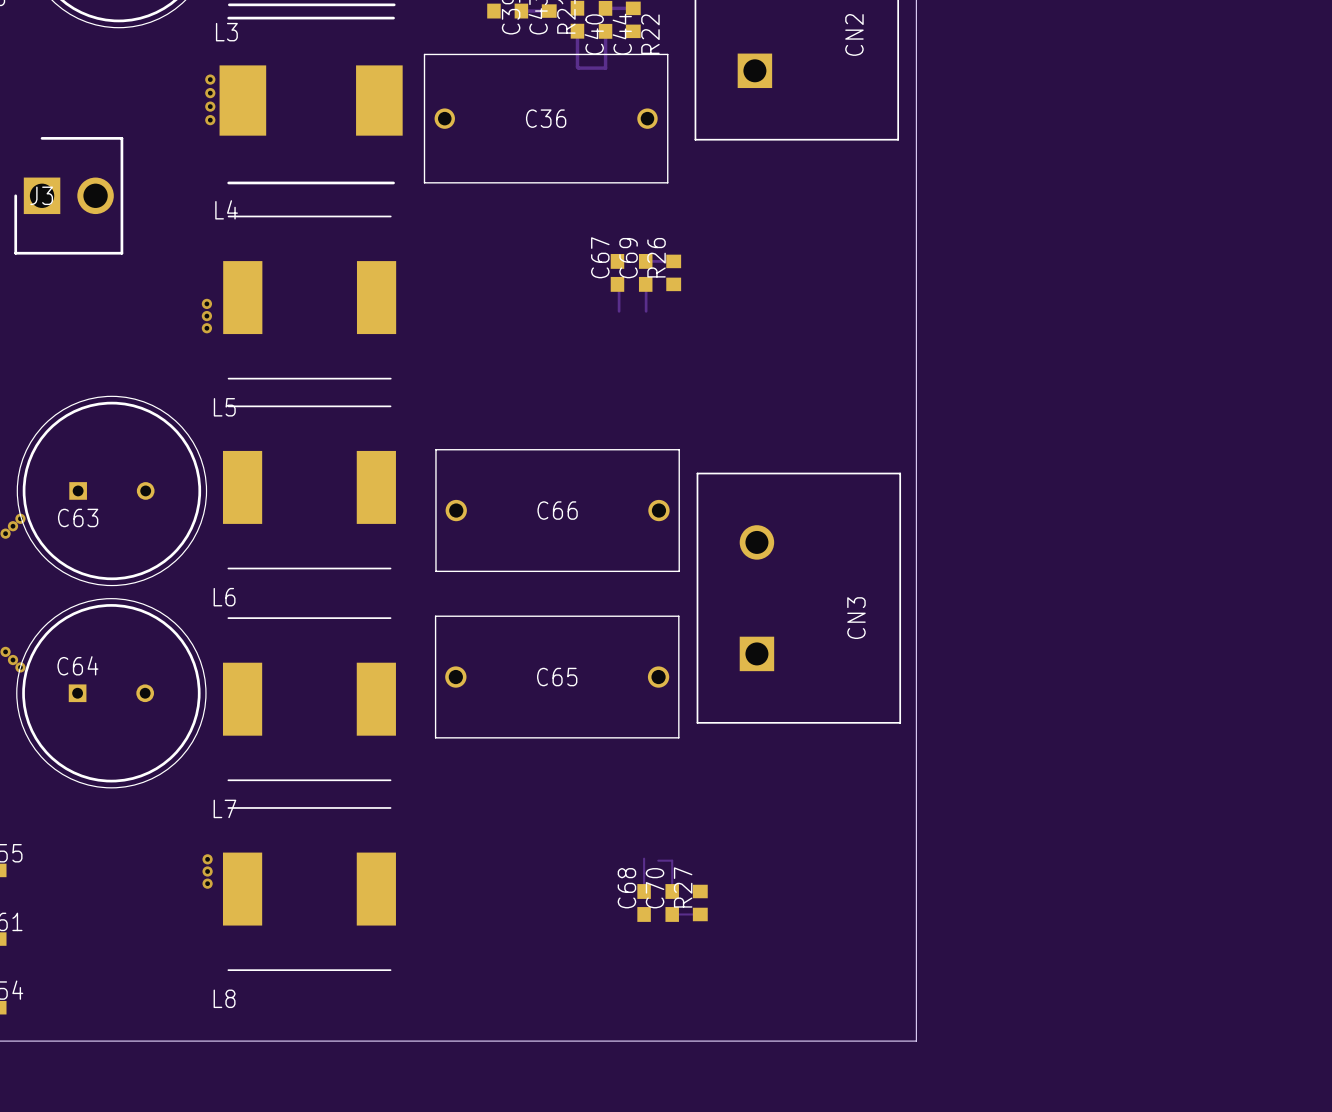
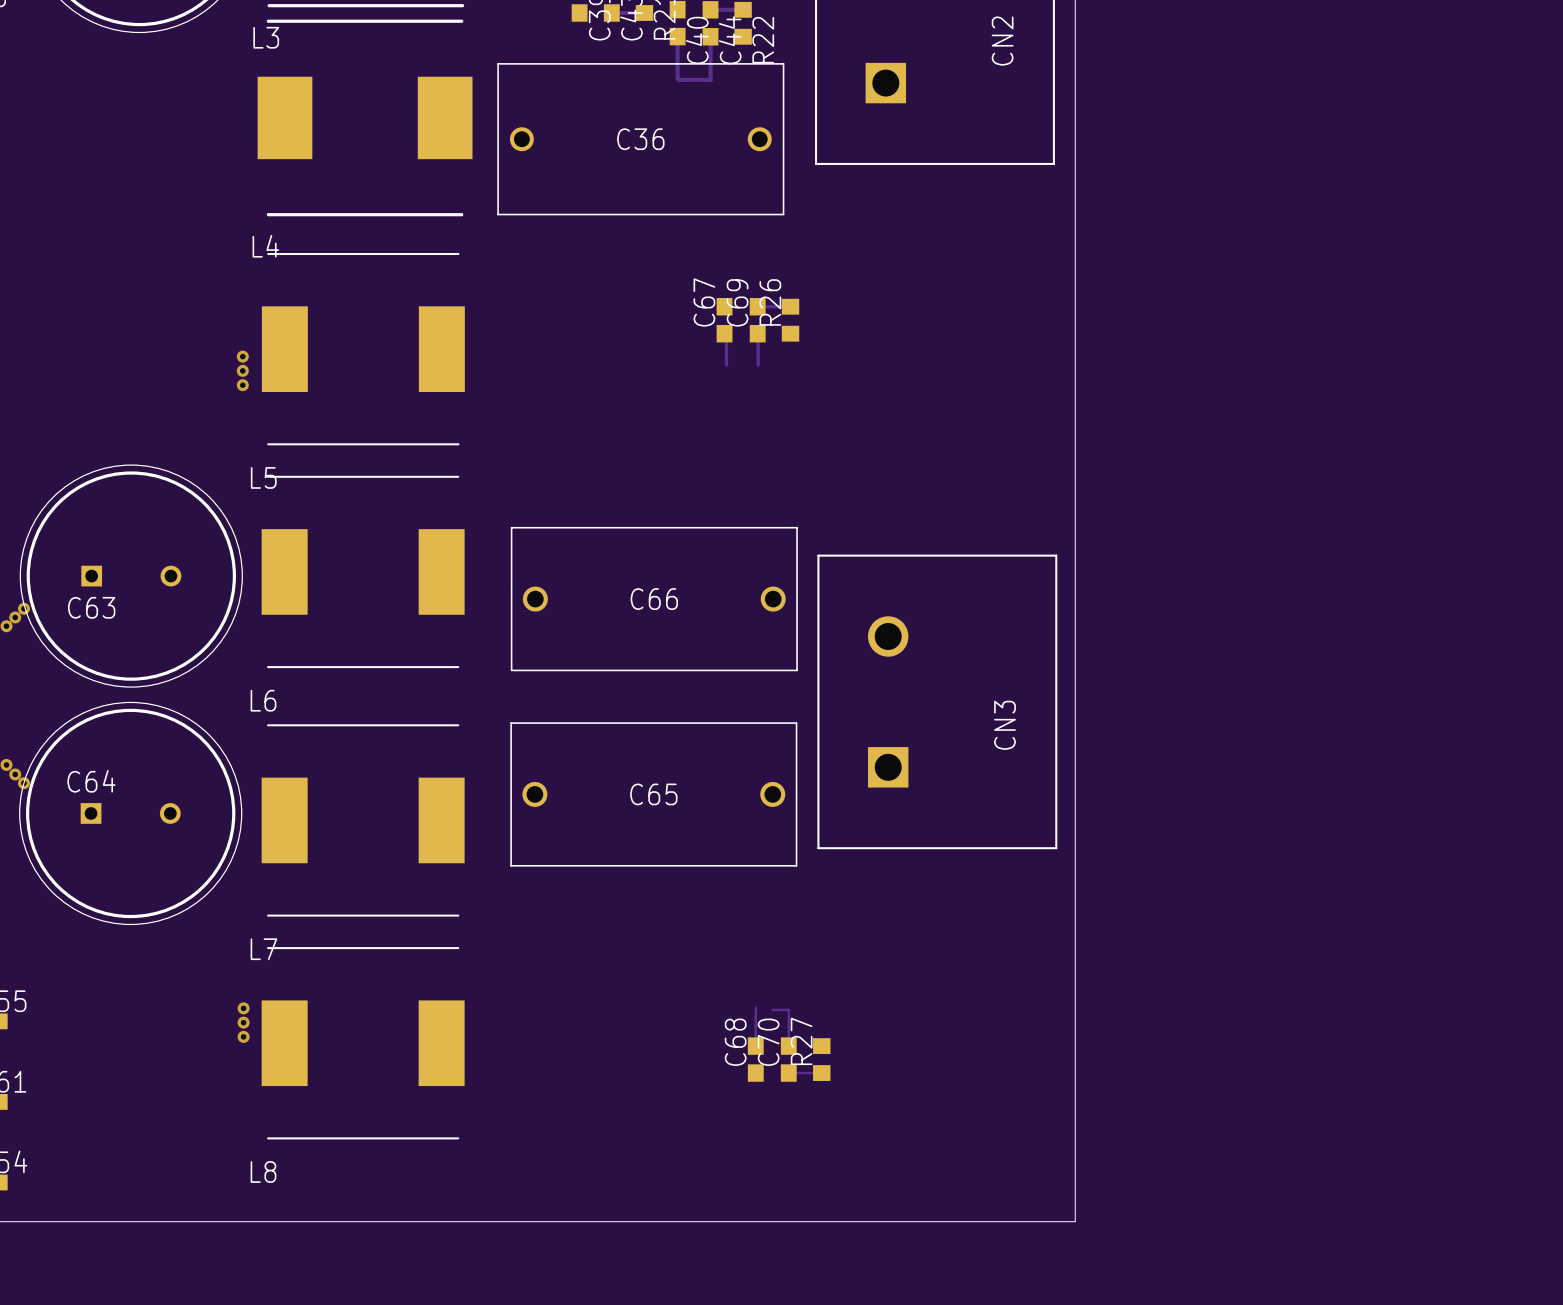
via: (210, 79) -> none
via: (210, 93) -> none
via: (210, 106) -> none
via: (210, 120) -> none
J3: (68, 195) -> none

